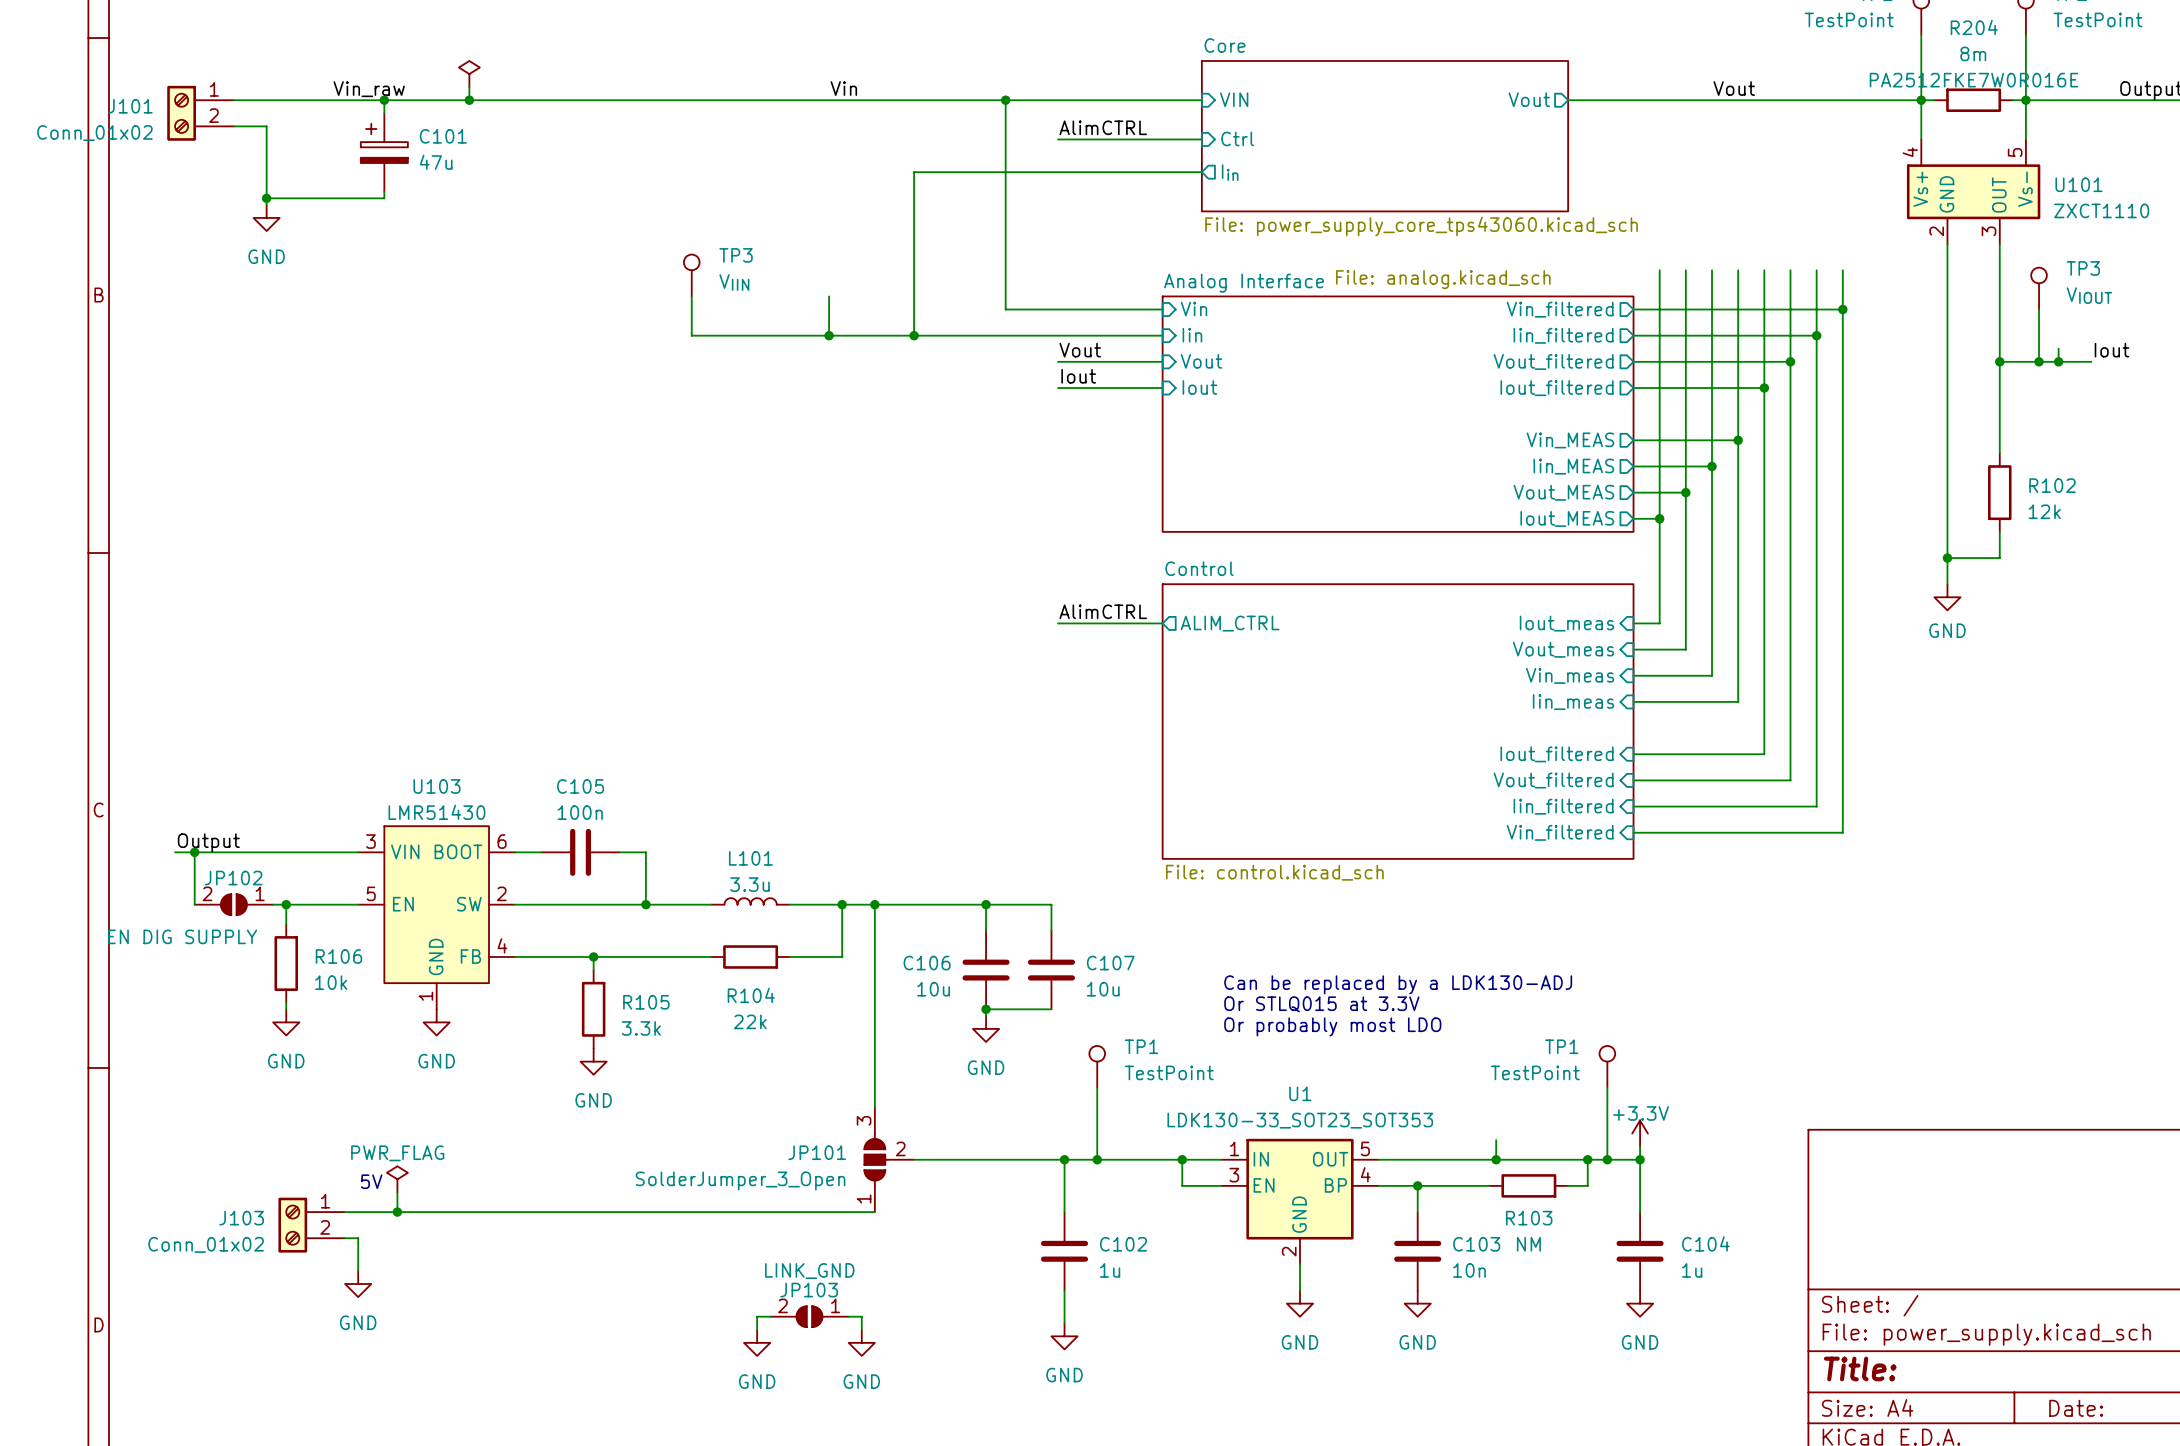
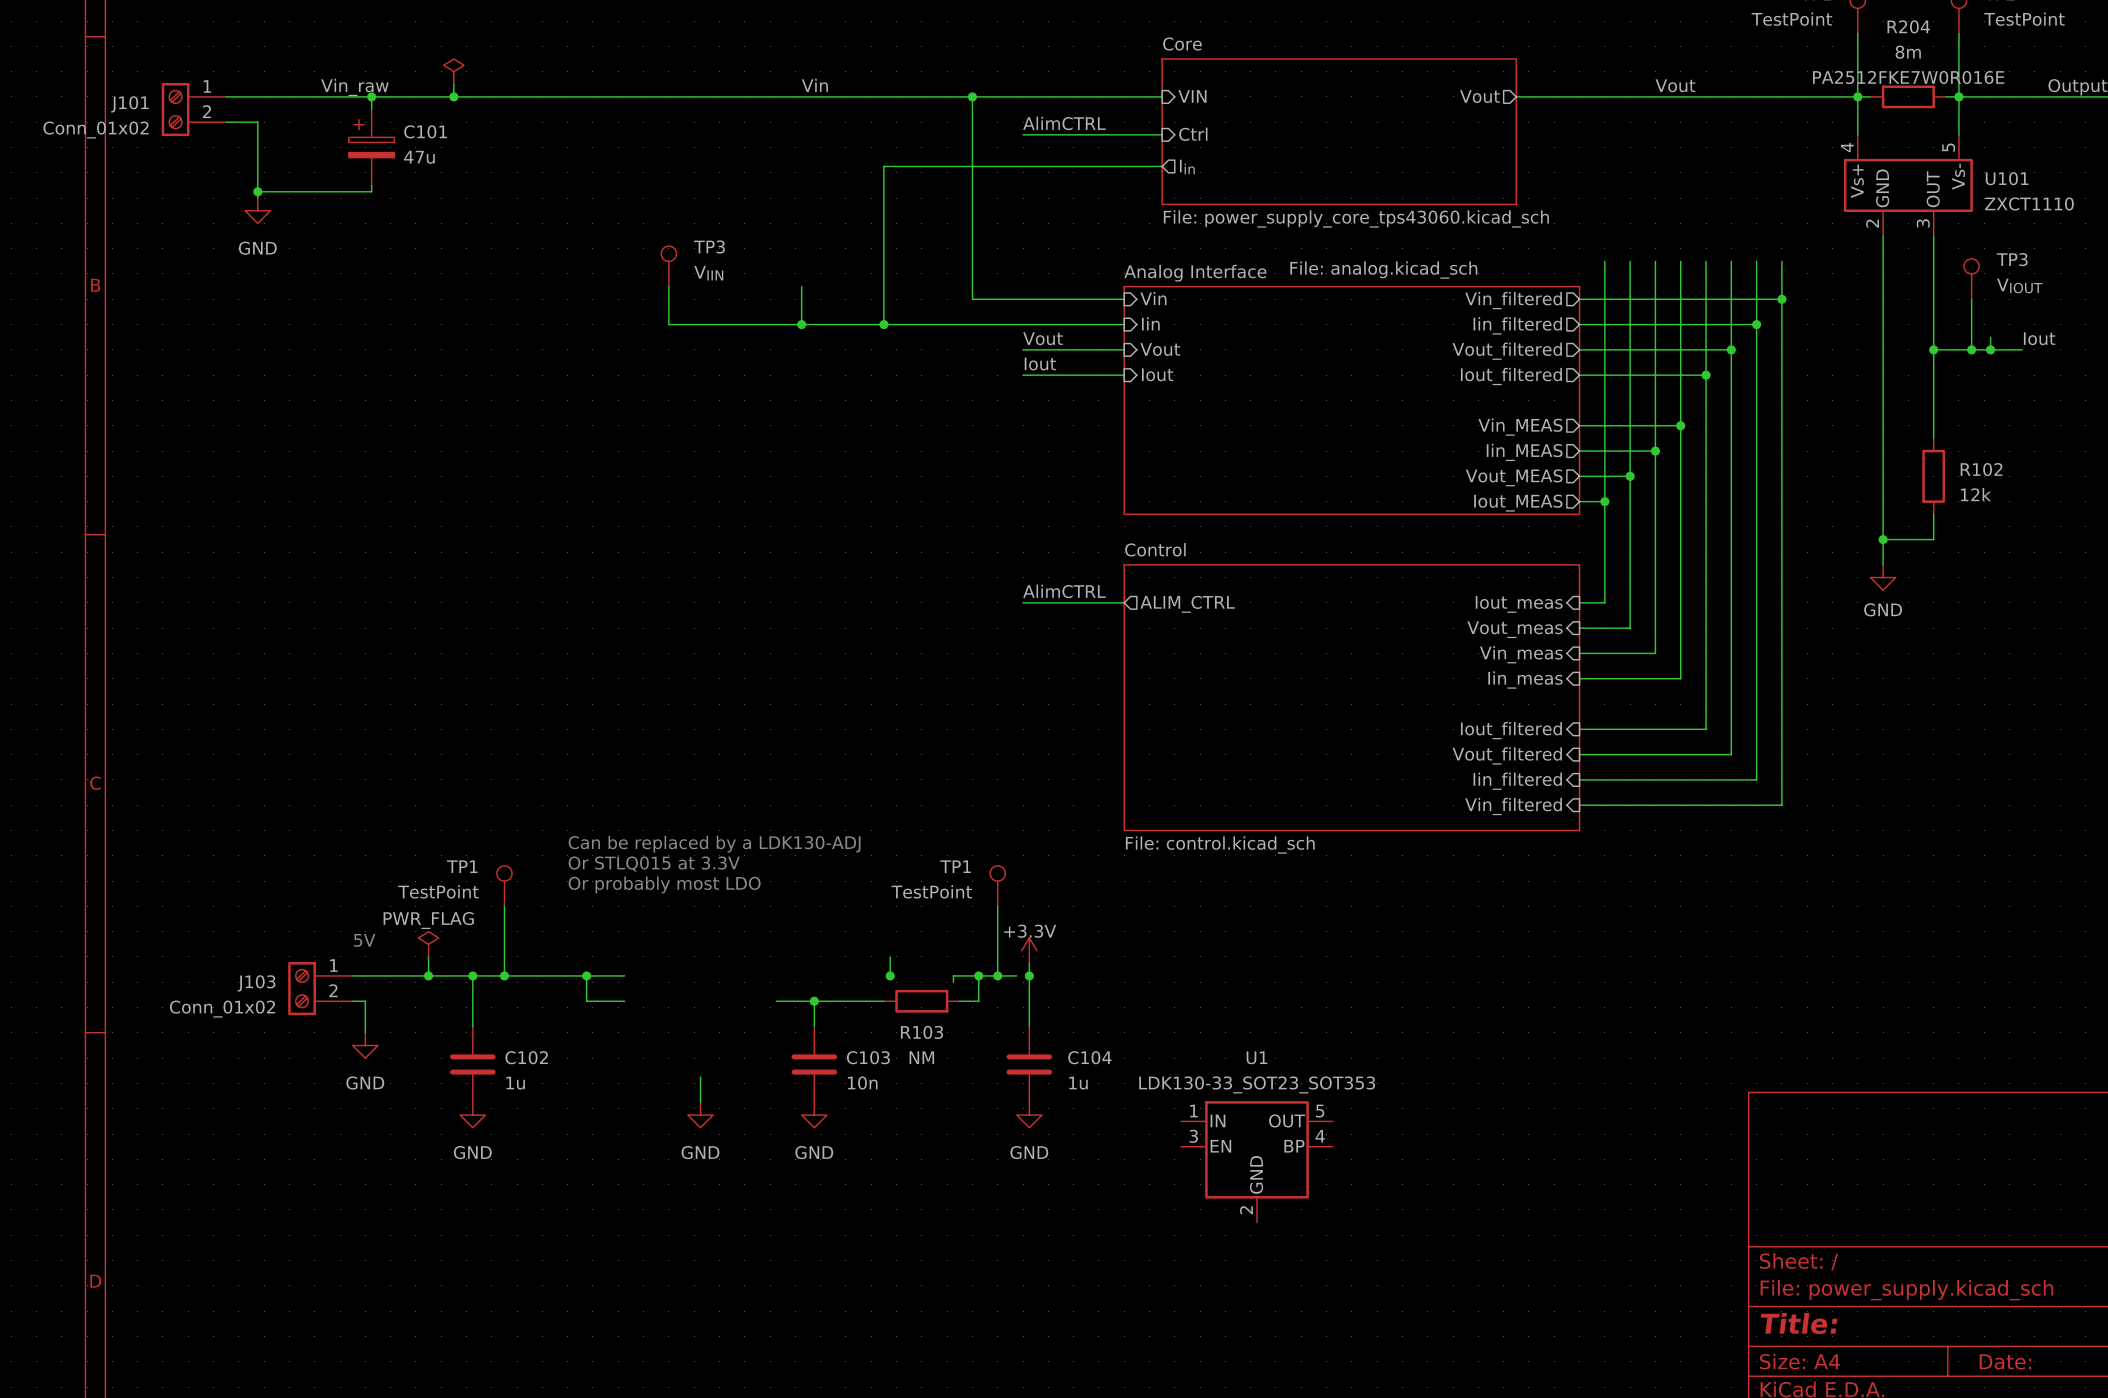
label: Output (208, 842) -> none
wire: (175, 852) (358, 852) -> none
wire: (194, 852) (194, 904) -> none
junction: (194, 852) -> none
wire: (515, 852) (541, 852) -> none
C105: 100n (580, 852) -> none
wire: (619, 852) (645, 852) (645, 904) -> none
text: none -> Can be replaced by a LDK130-ADJ (714, 844)
text: none -> Or STLQ015 at 3.3V (654, 864)
L101: 3.3u (750, 901) -> none
JP102: EN DIG SUPPLY (233, 904) -> none
wire: (273, 904) (358, 904) -> none
wire: (286, 904) (286, 924) -> (428, 956) (428, 975)
junction: (286, 904) -> none
wire: (515, 904) (711, 904) -> none
junction: (645, 904) -> none
wire: (789, 904) (1051, 904) (1051, 930) -> none
wire: (842, 904) (842, 956) (789, 956) -> none
junction: (842, 904) -> none
wire: (874, 904) (874, 1107) -> none
junction: (874, 904) -> none
wire: (986, 904) (986, 930) -> (814, 1001) (814, 1026)
junction: (986, 904) -> none
text: none -> Or probably most LDO (664, 884)
TP1: none -> TestPoint (504, 886)
U103: LMR51430 (436, 917) -> none
wire: none -> (504, 906) (504, 975)
wire: (515, 956) (711, 956) -> none
wire: (593, 956) (593, 970) -> none
junction: (593, 956) -> none
R104: 22k (750, 956) -> none
R106: 10k (286, 963) -> none
C106: 10u (986, 970) -> none
C107: 10u (1051, 970) -> none
power symbol: none -> +3.3V (1029, 950)
text: Can be replaced by a LDK130-ADJ (1398, 984) -> none
wire: none -> (890, 956) (890, 975)
wire: none -> (1029, 963) (1029, 1026)
wire: (286, 1002) (286, 1009) -> none
text: Or STLQ015 at 3.3V (1321, 1004) -> none
wire: none -> (352, 975) (624, 975)
junction: none -> (428, 975)
wire: none -> (472, 975) (472, 1026)
junction: none -> (472, 975)
junction: none -> (504, 975)
R105: 3.3k (593, 1009) -> none
wire: none -> (586, 975) (586, 1001) (624, 1001)
junction: none -> (586, 975)
junction: none -> (890, 975)
junction: (986, 1009) -> none
wire: none -> (978, 975) (978, 1001) (959, 1001)
junction: none -> (978, 975)
junction: none -> (997, 975)
junction: none -> (1029, 975)
power symbol: GND (286, 1022) -> none
power symbol: GND (436, 1022) -> none
text: Or probably most LDO (1332, 1026) -> none
power symbol: GND (986, 1028) -> none
wire: none -> (776, 1001) (883, 1001)
junction: none -> (814, 1001)
TP1 name position: TP1 (1141, 1046) -> TP1 (955, 866)
power symbol: GND (593, 1061) -> none
TP1 position: (1097, 1066) -> (997, 886)
TP1: TestPoint (1607, 1066) -> none
TP1 value position: TestPoint (1169, 1072) -> TestPoint (931, 891)
power symbol: none -> GND (365, 1045)
wire: (1097, 1087) (1097, 1159) -> (997, 906) (997, 975)
wire: (1607, 1087) (1607, 1159) -> none
wire: none -> (700, 1077) (700, 1102)
power symbol: +3.3V (1640, 1133) -> none
wire: (1496, 1140) (1496, 1159) -> none
wire: (1640, 1146) (1640, 1212) -> none
power symbol: none -> GND (472, 1115)
power symbol: none -> GND (700, 1115)
power symbol: none -> GND (814, 1115)
power symbol: none -> GND (1029, 1115)
JP101: SolderJumper_3_Open (889, 1159) -> none
wire: (914, 1159) (1221, 1159) -> none
wire: (1064, 1159) (1064, 1212) -> none
junction: (1064, 1159) -> none
junction: (1097, 1159) -> none
wire: (1182, 1159) (1182, 1185) (1221, 1185) -> none
junction: (1182, 1159) -> none
wire: (1378, 1159) (1640, 1159) -> none
junction: (1496, 1159) -> none
wire: (1587, 1159) (1587, 1185) (1568, 1185) -> none
junction: (1587, 1159) -> none
junction: (1607, 1159) -> none
junction: (1640, 1159) -> none
power symbol position: PWR_FLAG (397, 1179) -> PWR_FLAG (428, 944)
text position: 5V (371, 1181) -> 5V (364, 940)
wire: (1378, 1185) (1489, 1185) -> none
wire: (1417, 1185) (1417, 1212) -> none
junction: (1417, 1185) -> none
R103 position: (1528, 1185) -> (921, 1001)
wire: (397, 1192) (397, 1212) -> none
wire: (345, 1212) (874, 1212) -> none
junction: (397, 1212) -> none
J103 position: (311, 1225) -> (320, 988)
wire: (345, 1238) (358, 1238) (358, 1270) -> (352, 1001) (365, 1001) (365, 1032)
C102 position: (1064, 1251) -> (472, 1064)
C103 position: (1417, 1251) -> (814, 1064)
C104 position: (1640, 1251) -> (1029, 1064)
wire: (1299, 1264) (1299, 1290) -> none
power symbol: GND (358, 1284) -> none
wire: (1064, 1290) (1064, 1323) -> none
power symbol: GND (1299, 1303) -> none
power symbol: GND (1417, 1303) -> none
power symbol: GND (1640, 1303) -> none
wire: (770, 1316) (757, 1316) (757, 1329) -> none
JP103: LINK_GND (809, 1316) -> none
wire: (848, 1316) (861, 1316) (861, 1329) -> none
power symbol: GND (1064, 1336) -> none
power symbol: GND (757, 1342) -> none
power symbol: GND (861, 1342) -> none

